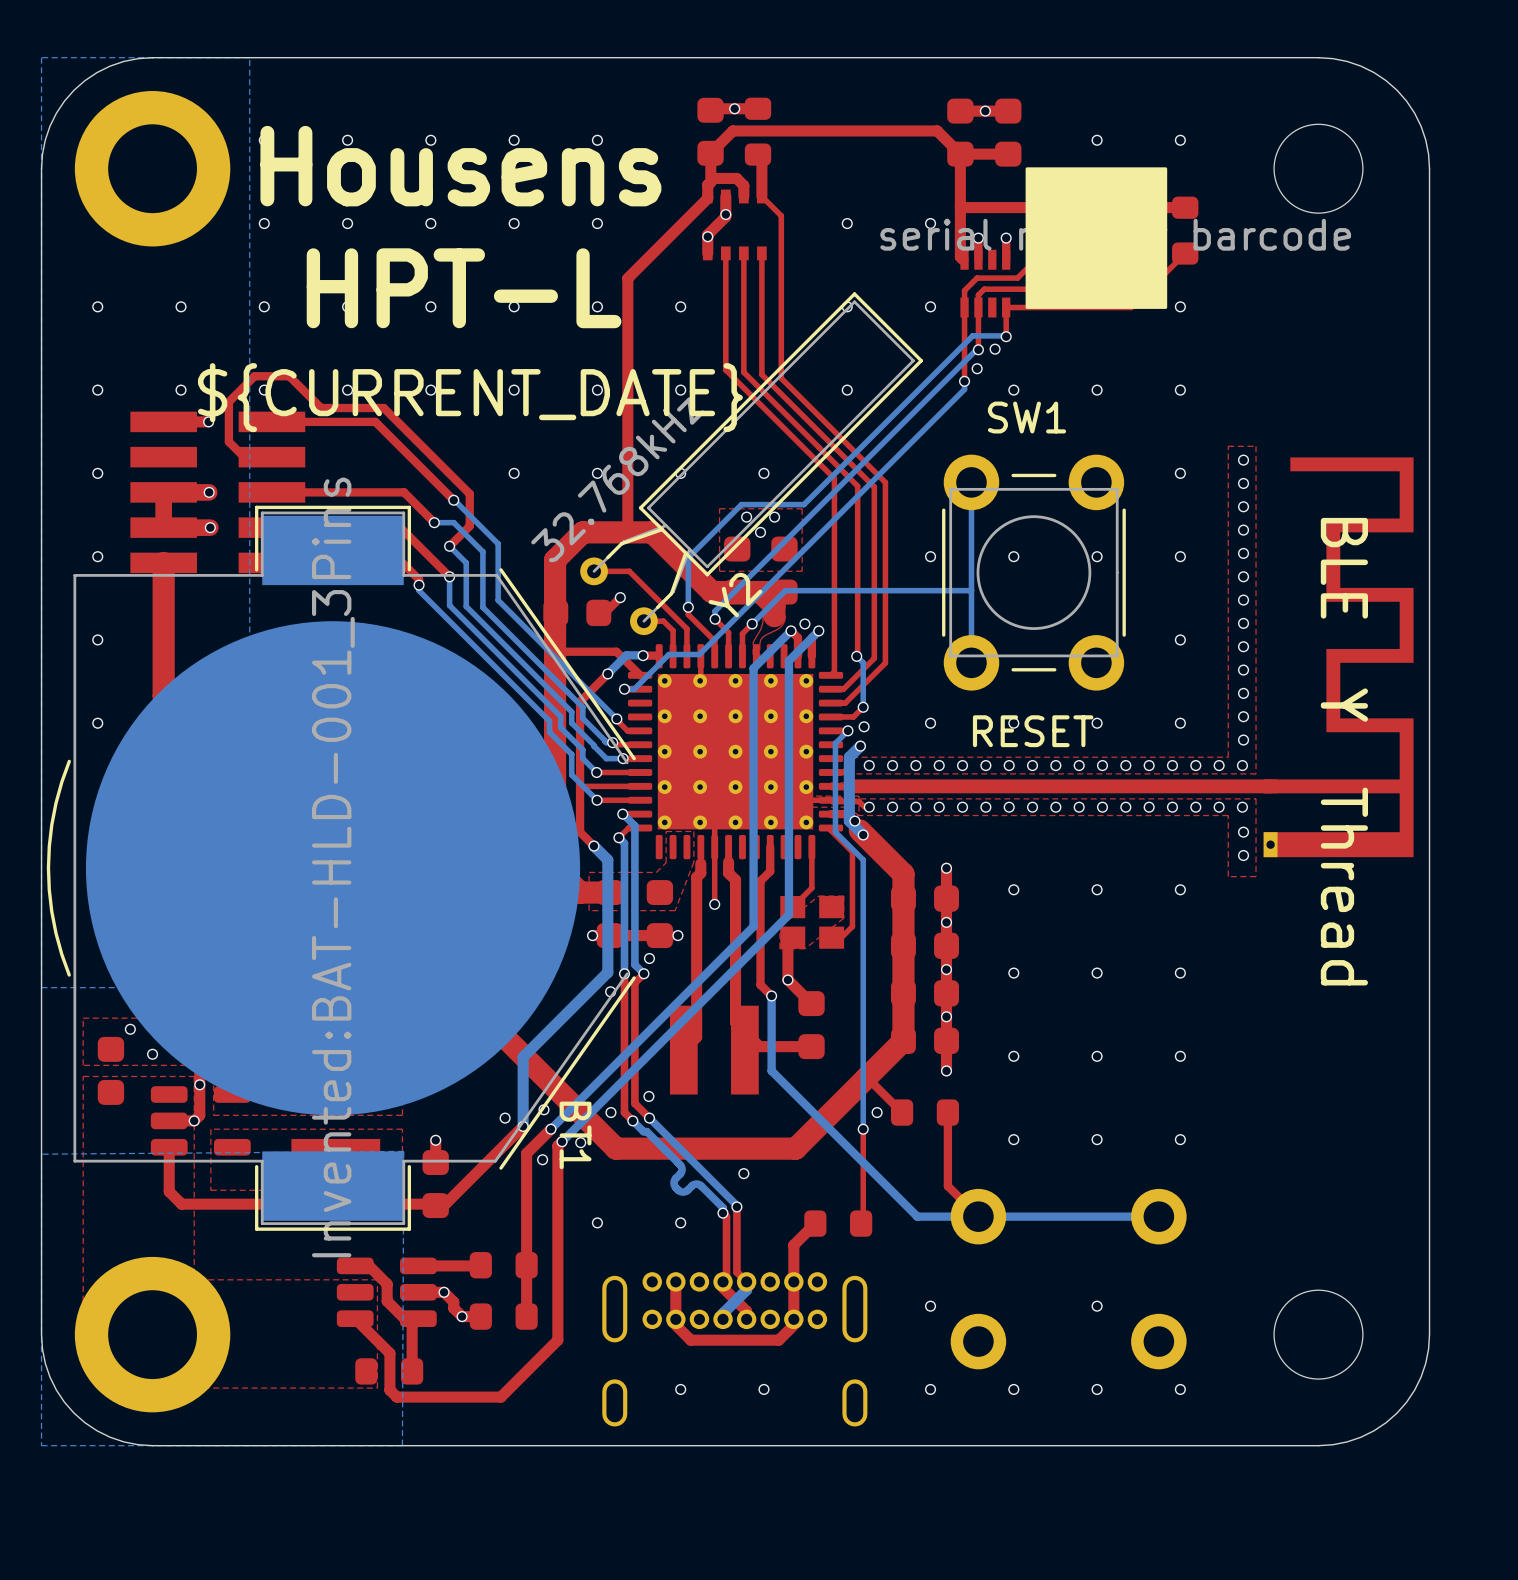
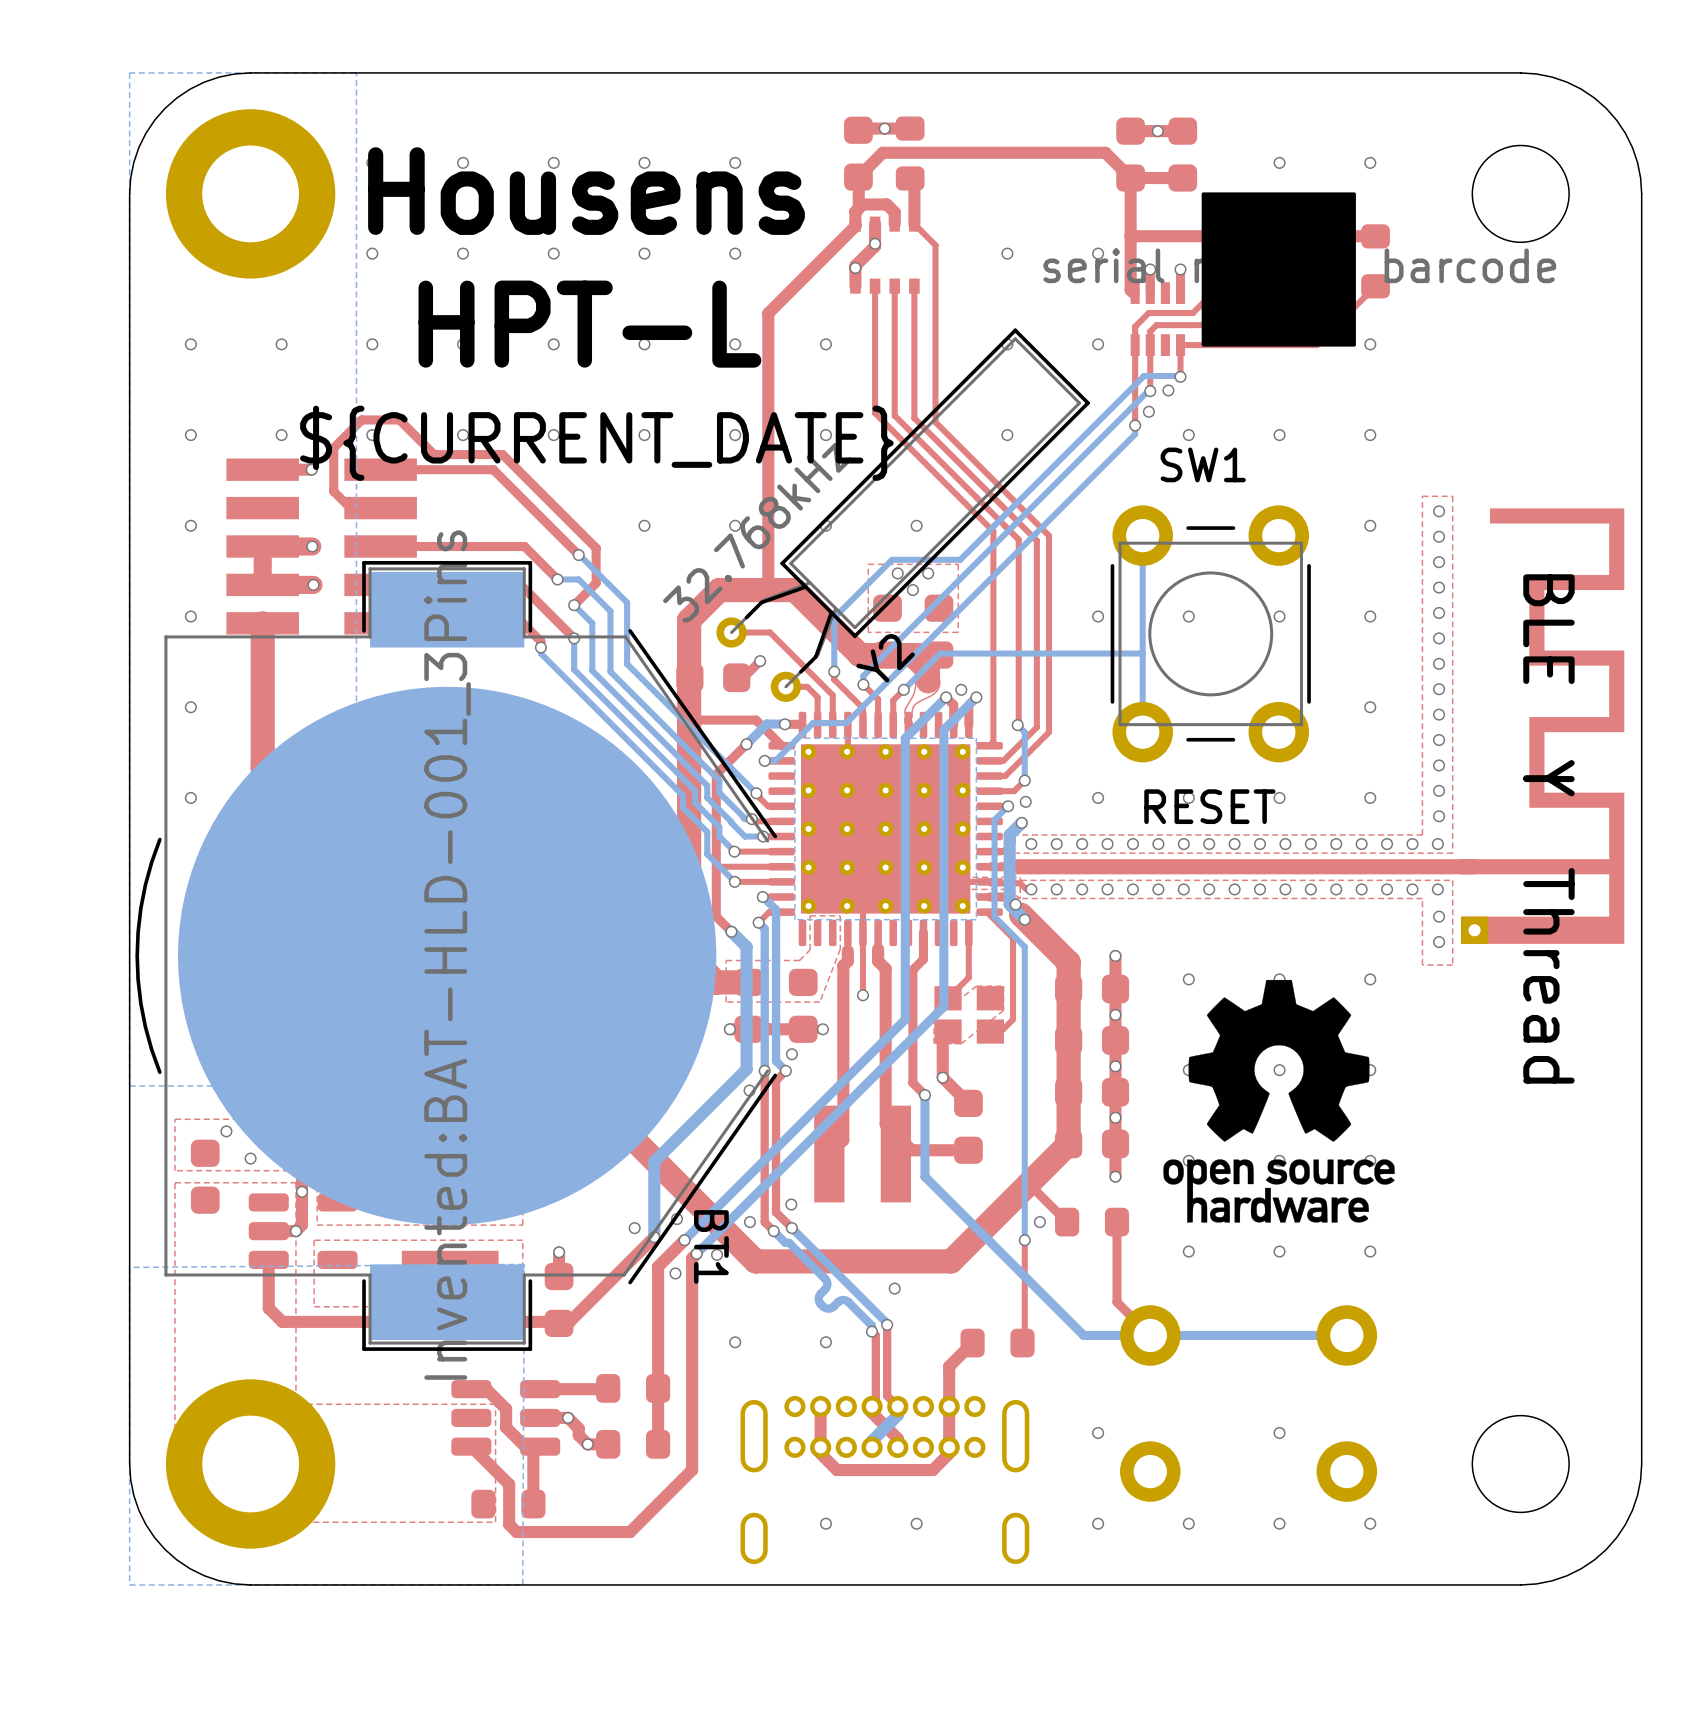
part footprint: [1263, 457, 1414, 858] -> [1460, 508, 1625, 944]
bottom zone outline: none -> (976, 738) (976, 919) (794, 919) (794, 738) (976, 738)
drawing: none -> [1163, 979, 1395, 1223]

